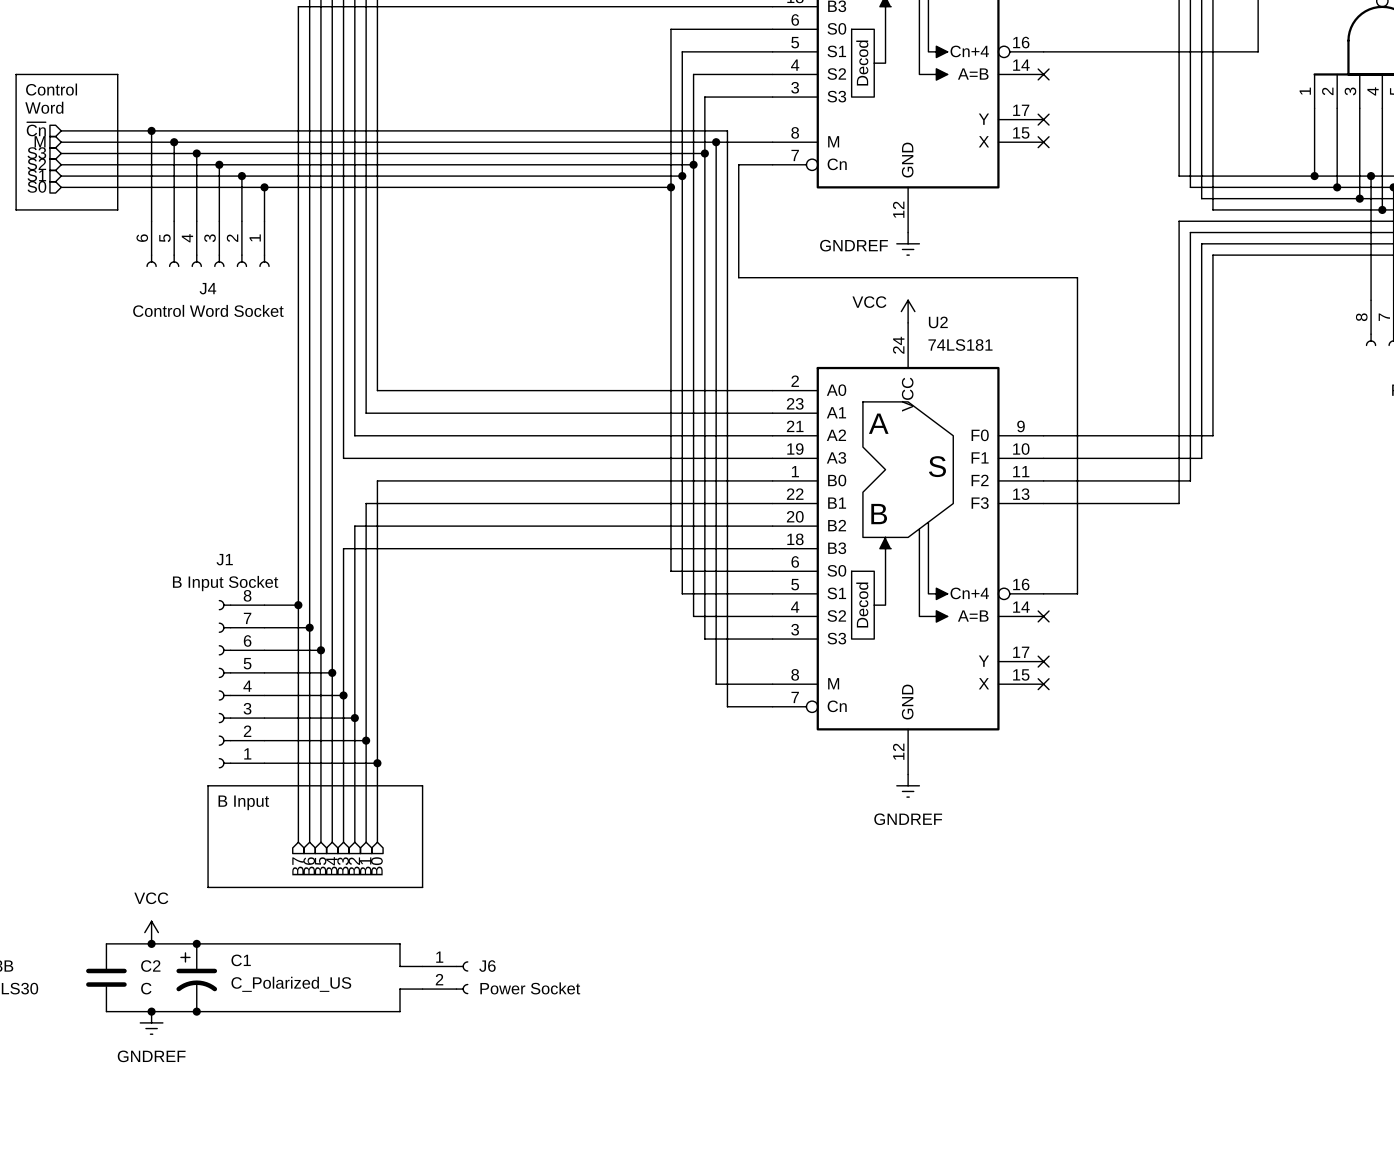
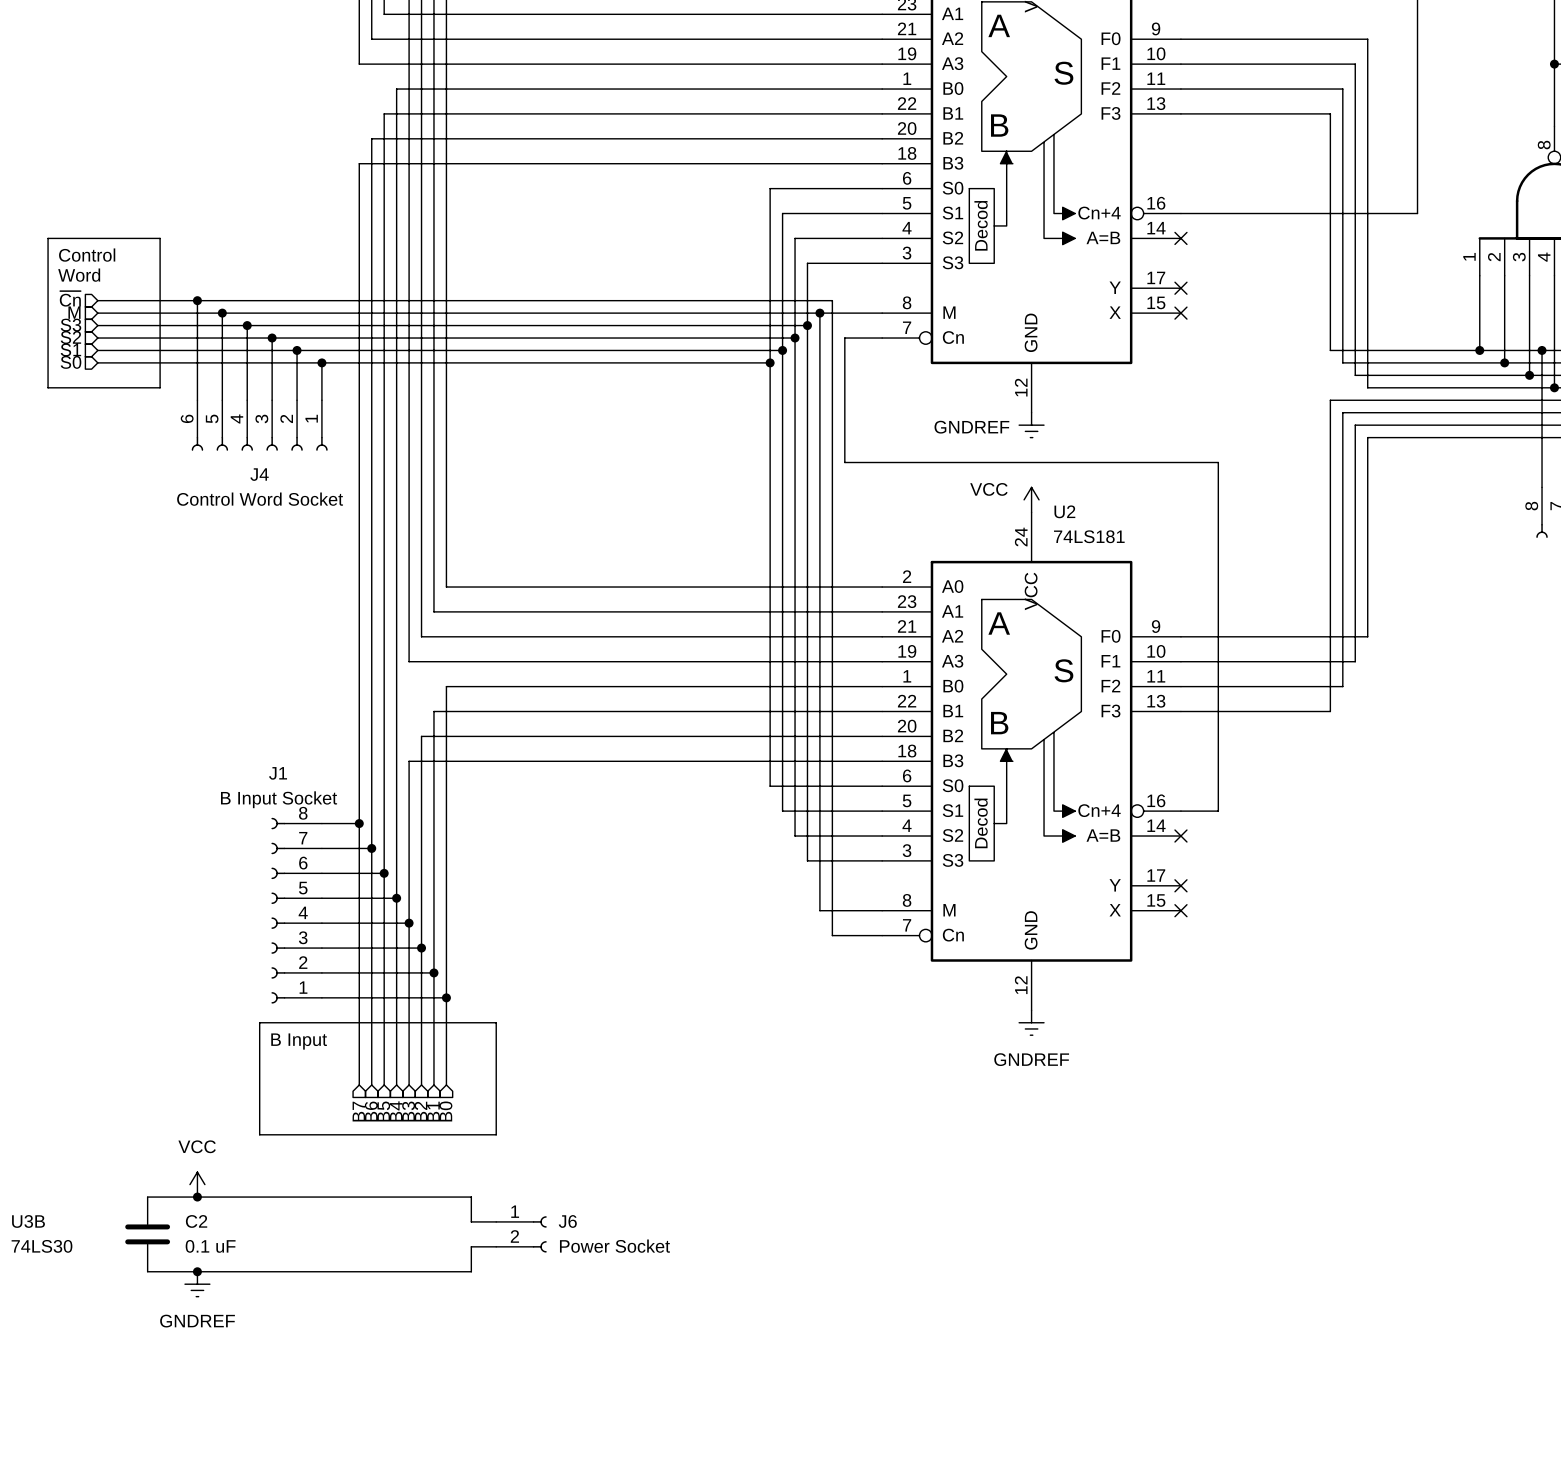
junction: (196, 943) -> none
C1: C_Polarized_US (196, 977) -> none
C2 value: C (146, 988) -> 0.1 uF (210, 1246)
junction: (196, 1011) -> none

